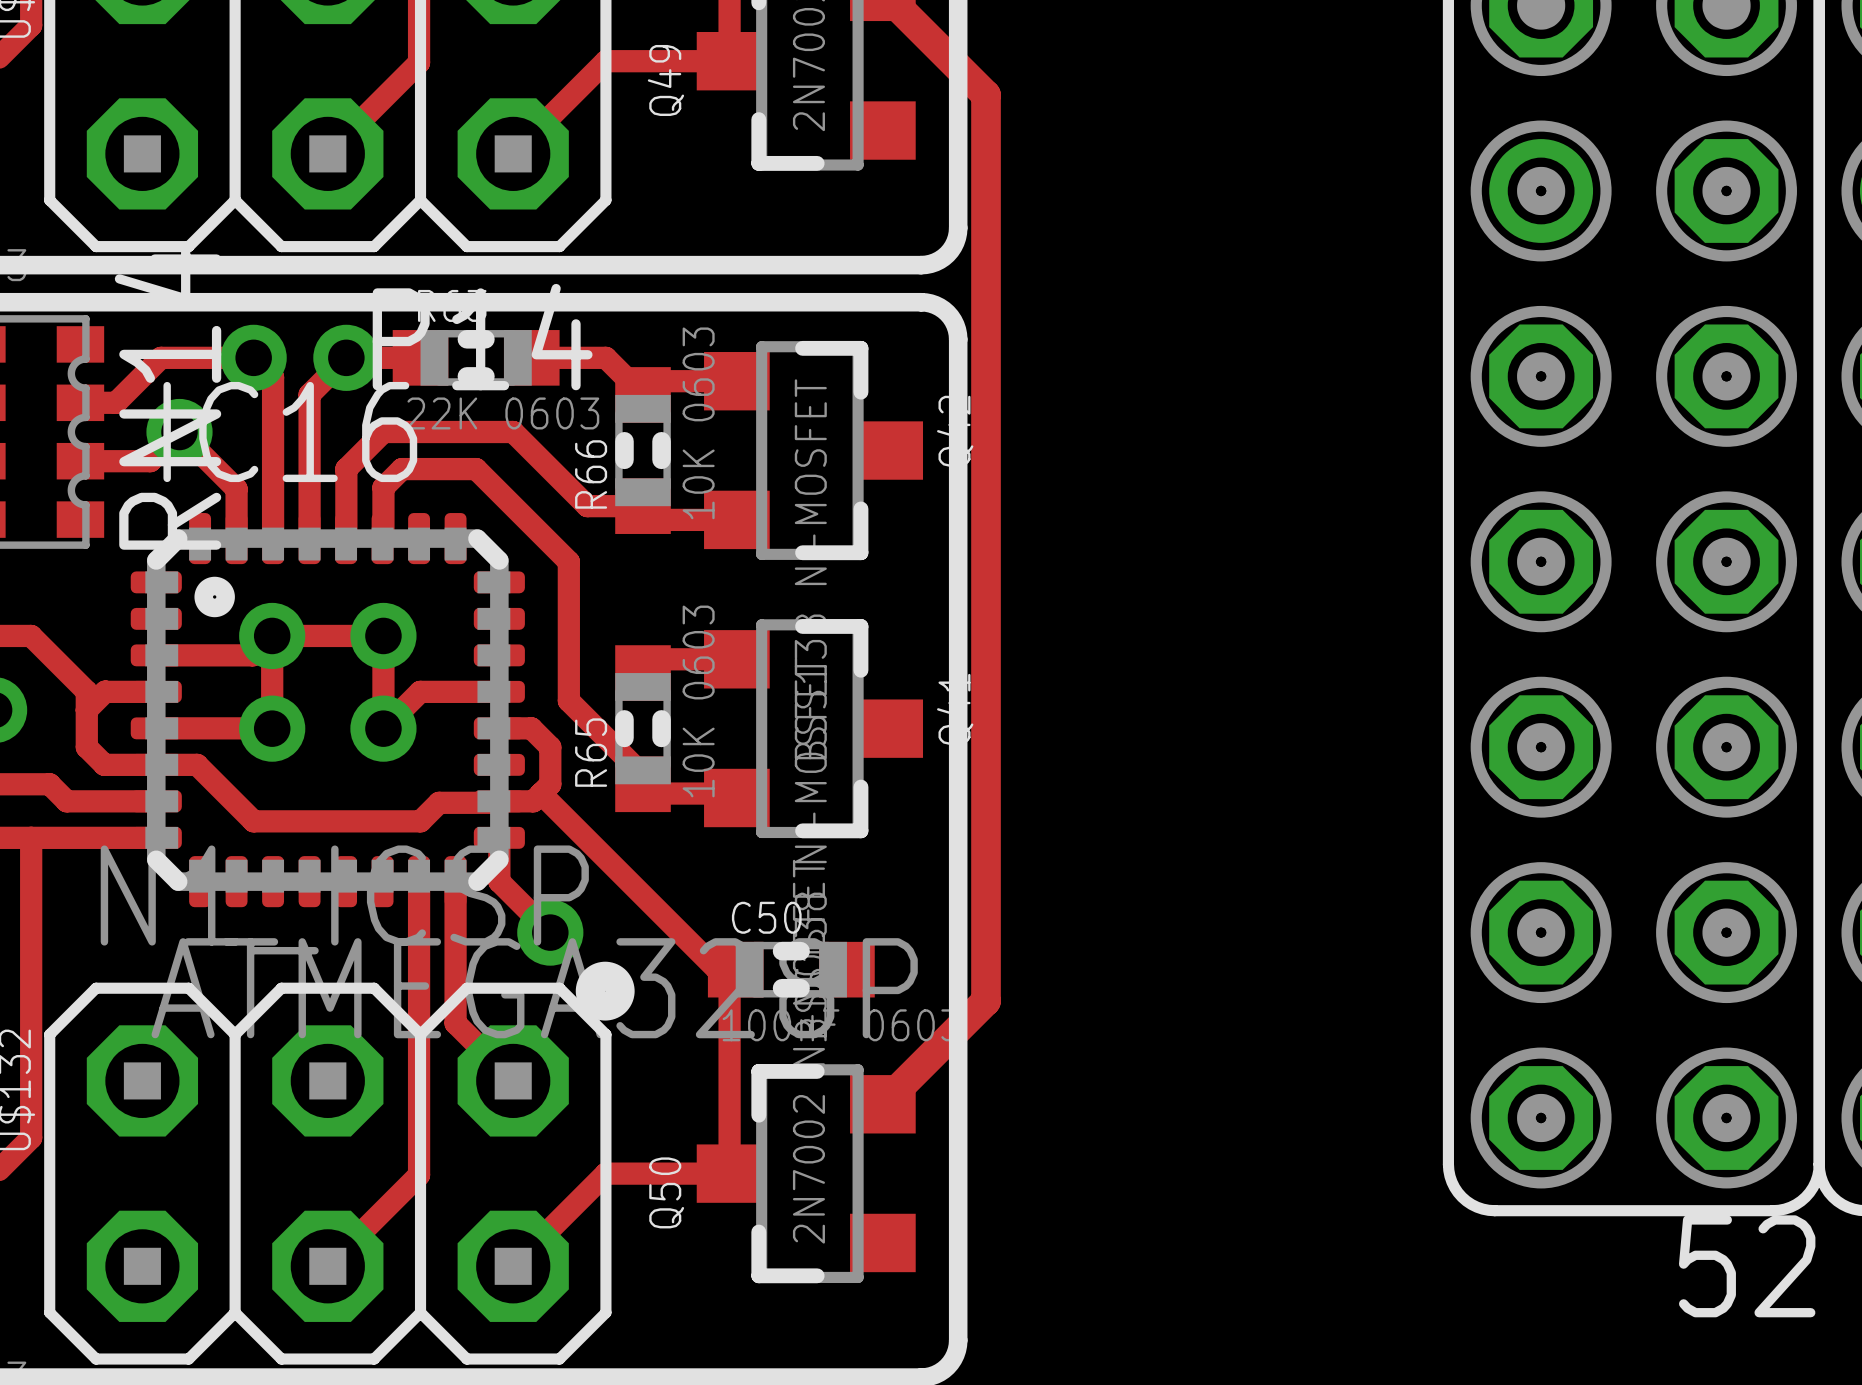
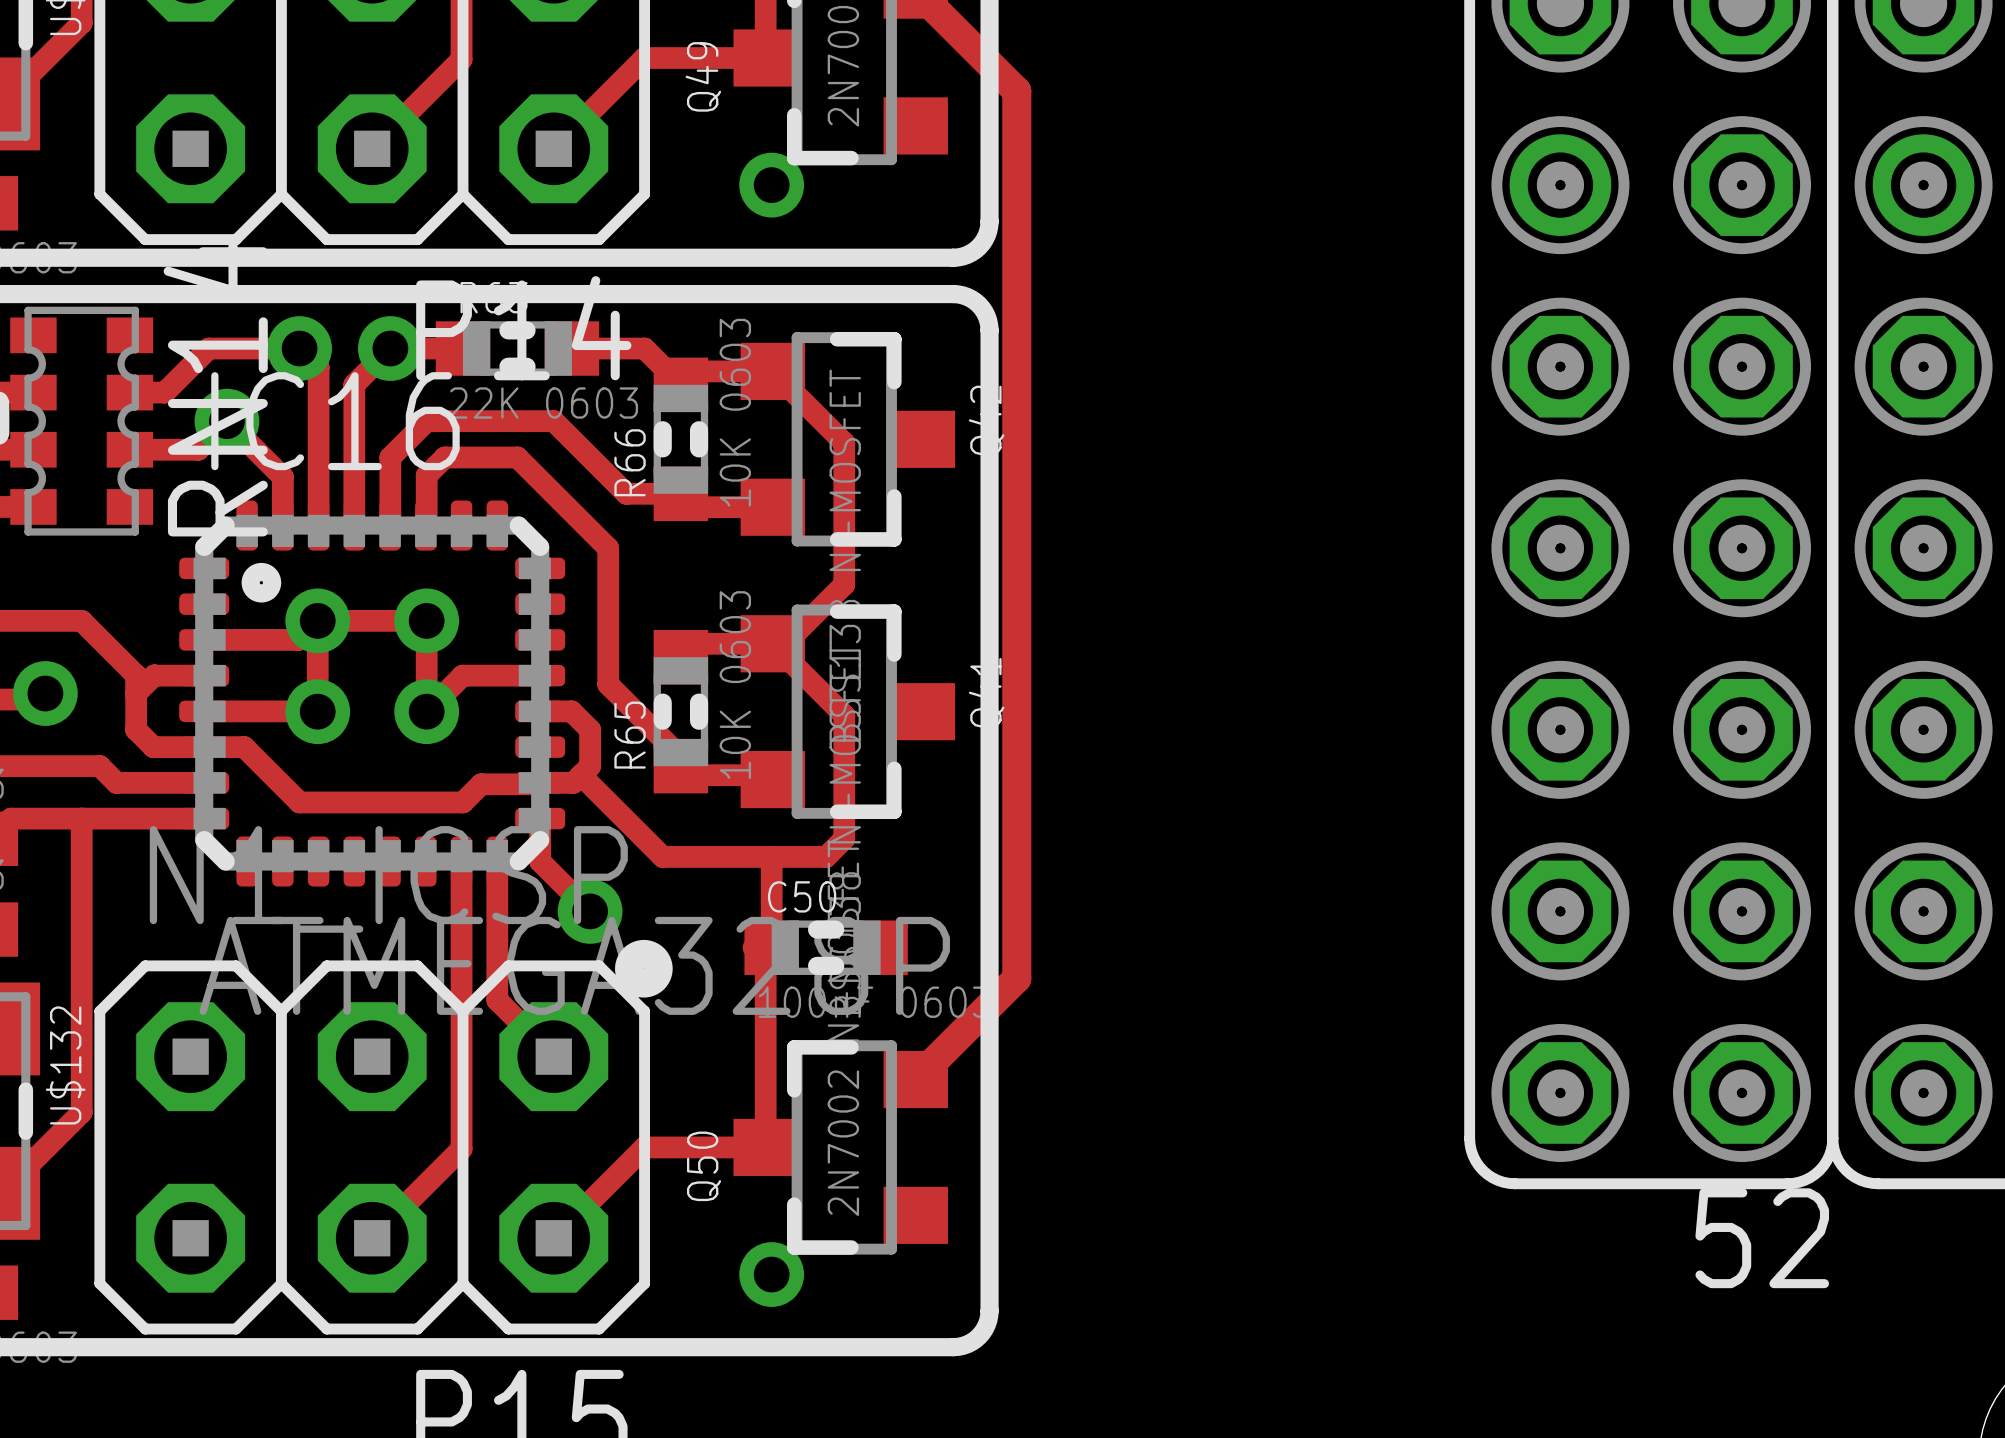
via: none -> (771, 185)
track: (624, 876) (717, 969) -> (662, 856) (826, 856) (844, 838) (844, 715) (772, 643) (785, 643) (844, 584) (844, 442) (772, 371)
track: none -> (771, 856) (771, 947)
via: none -> (771, 1274)

